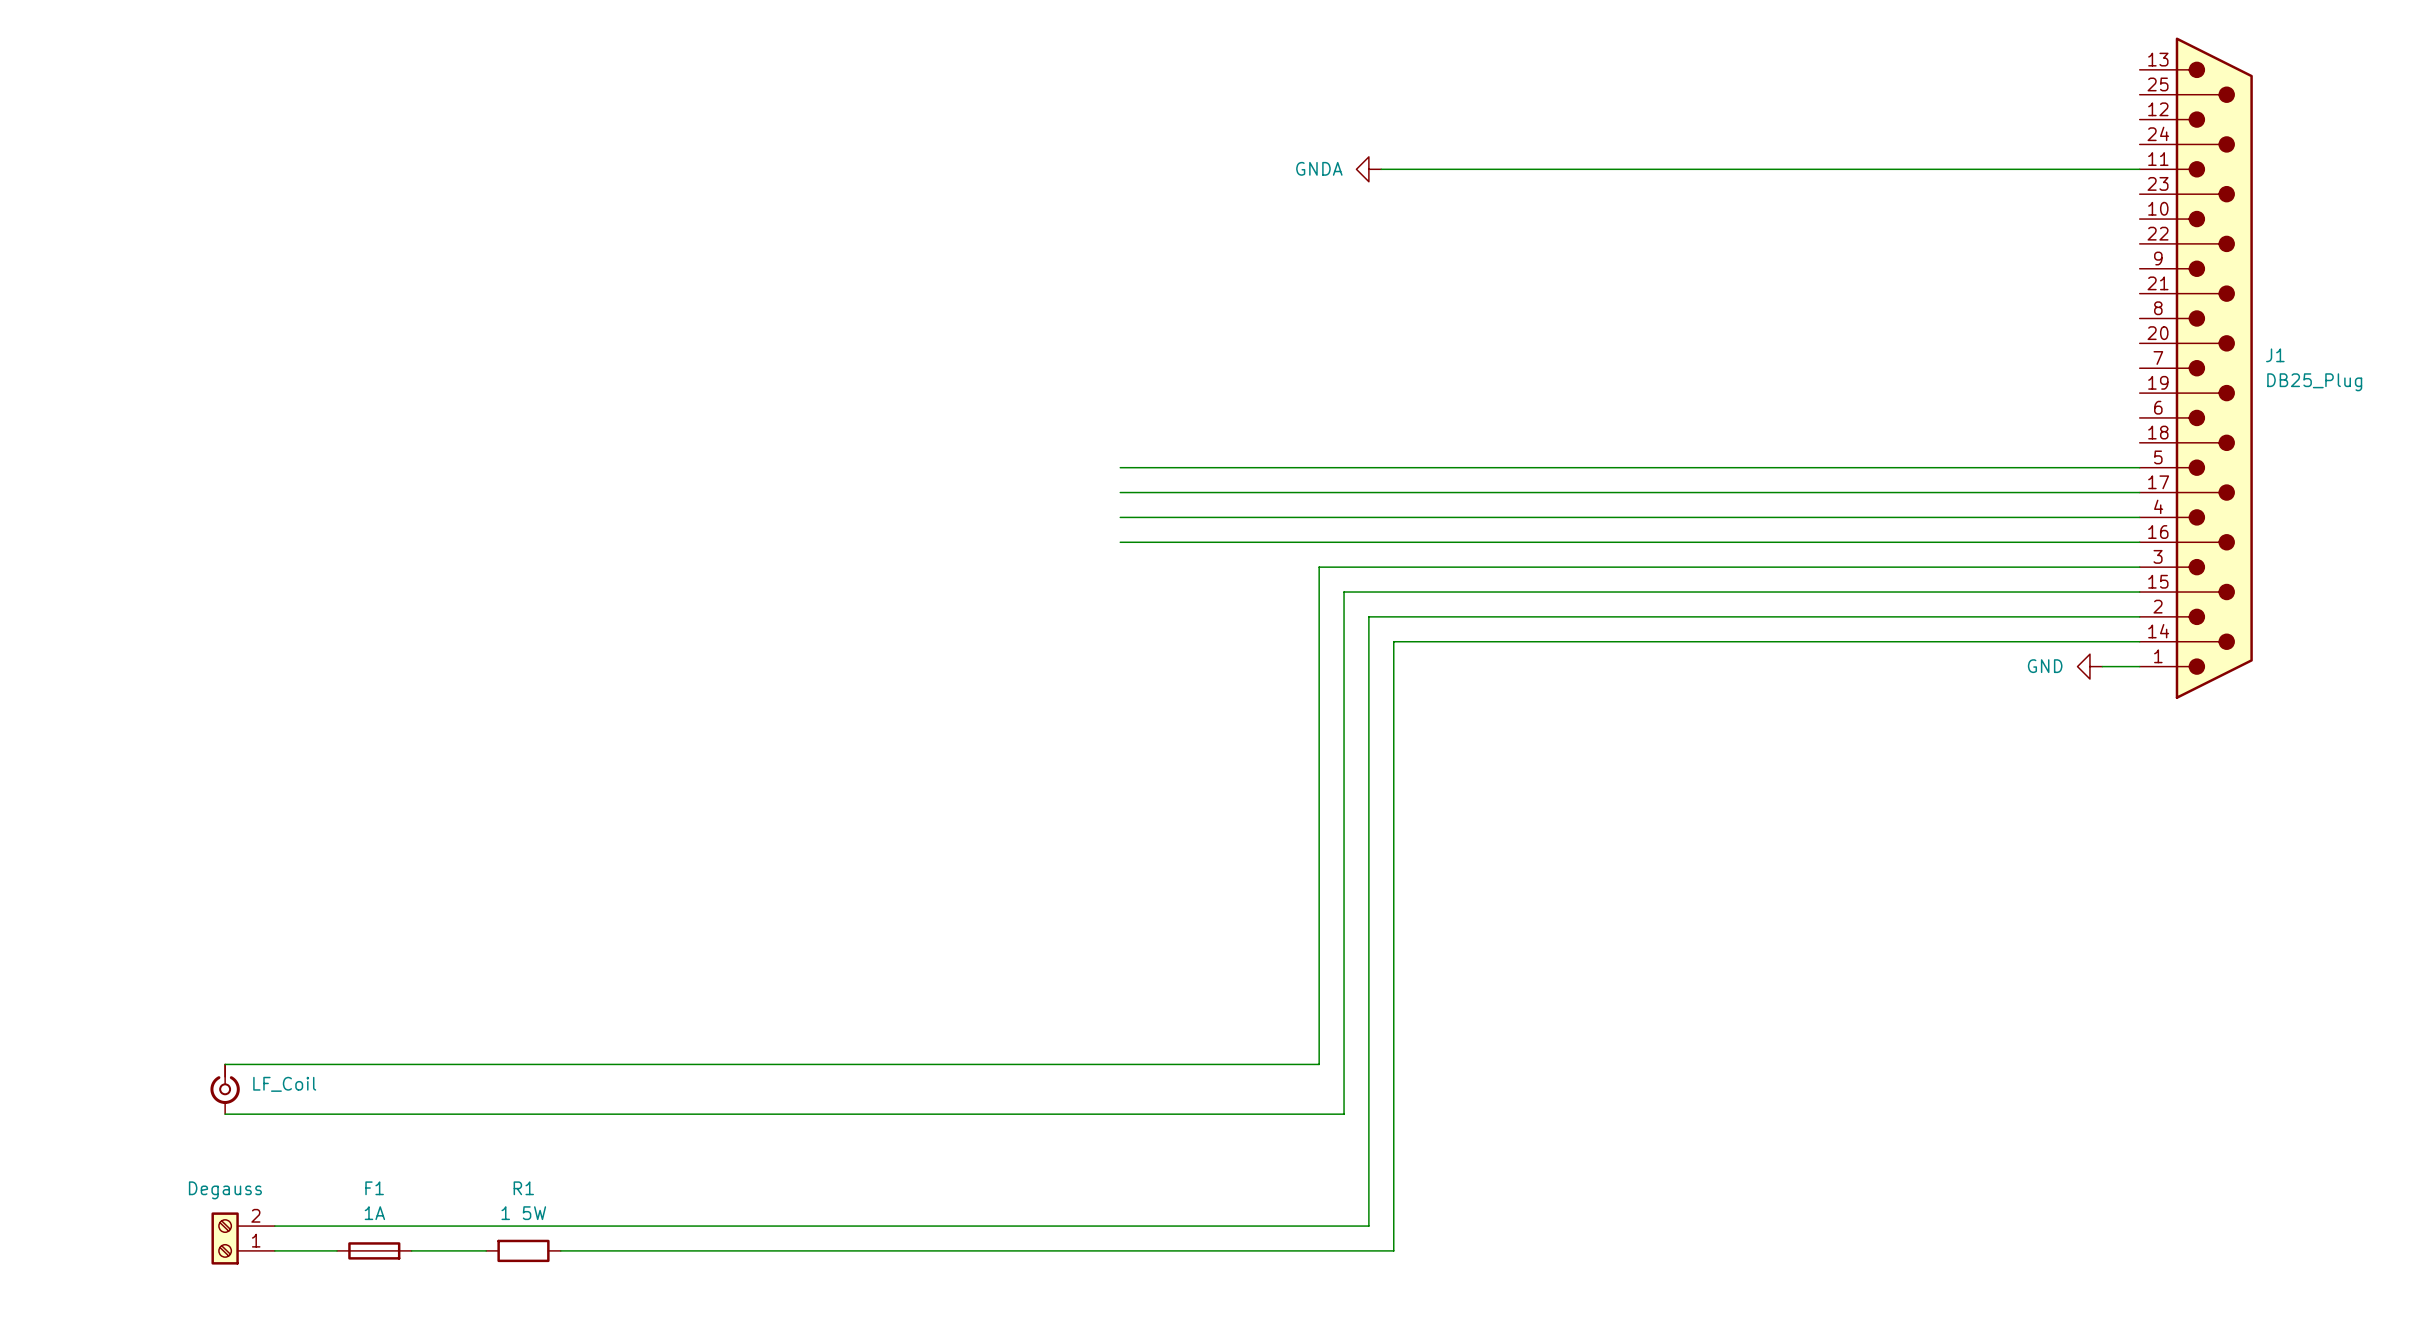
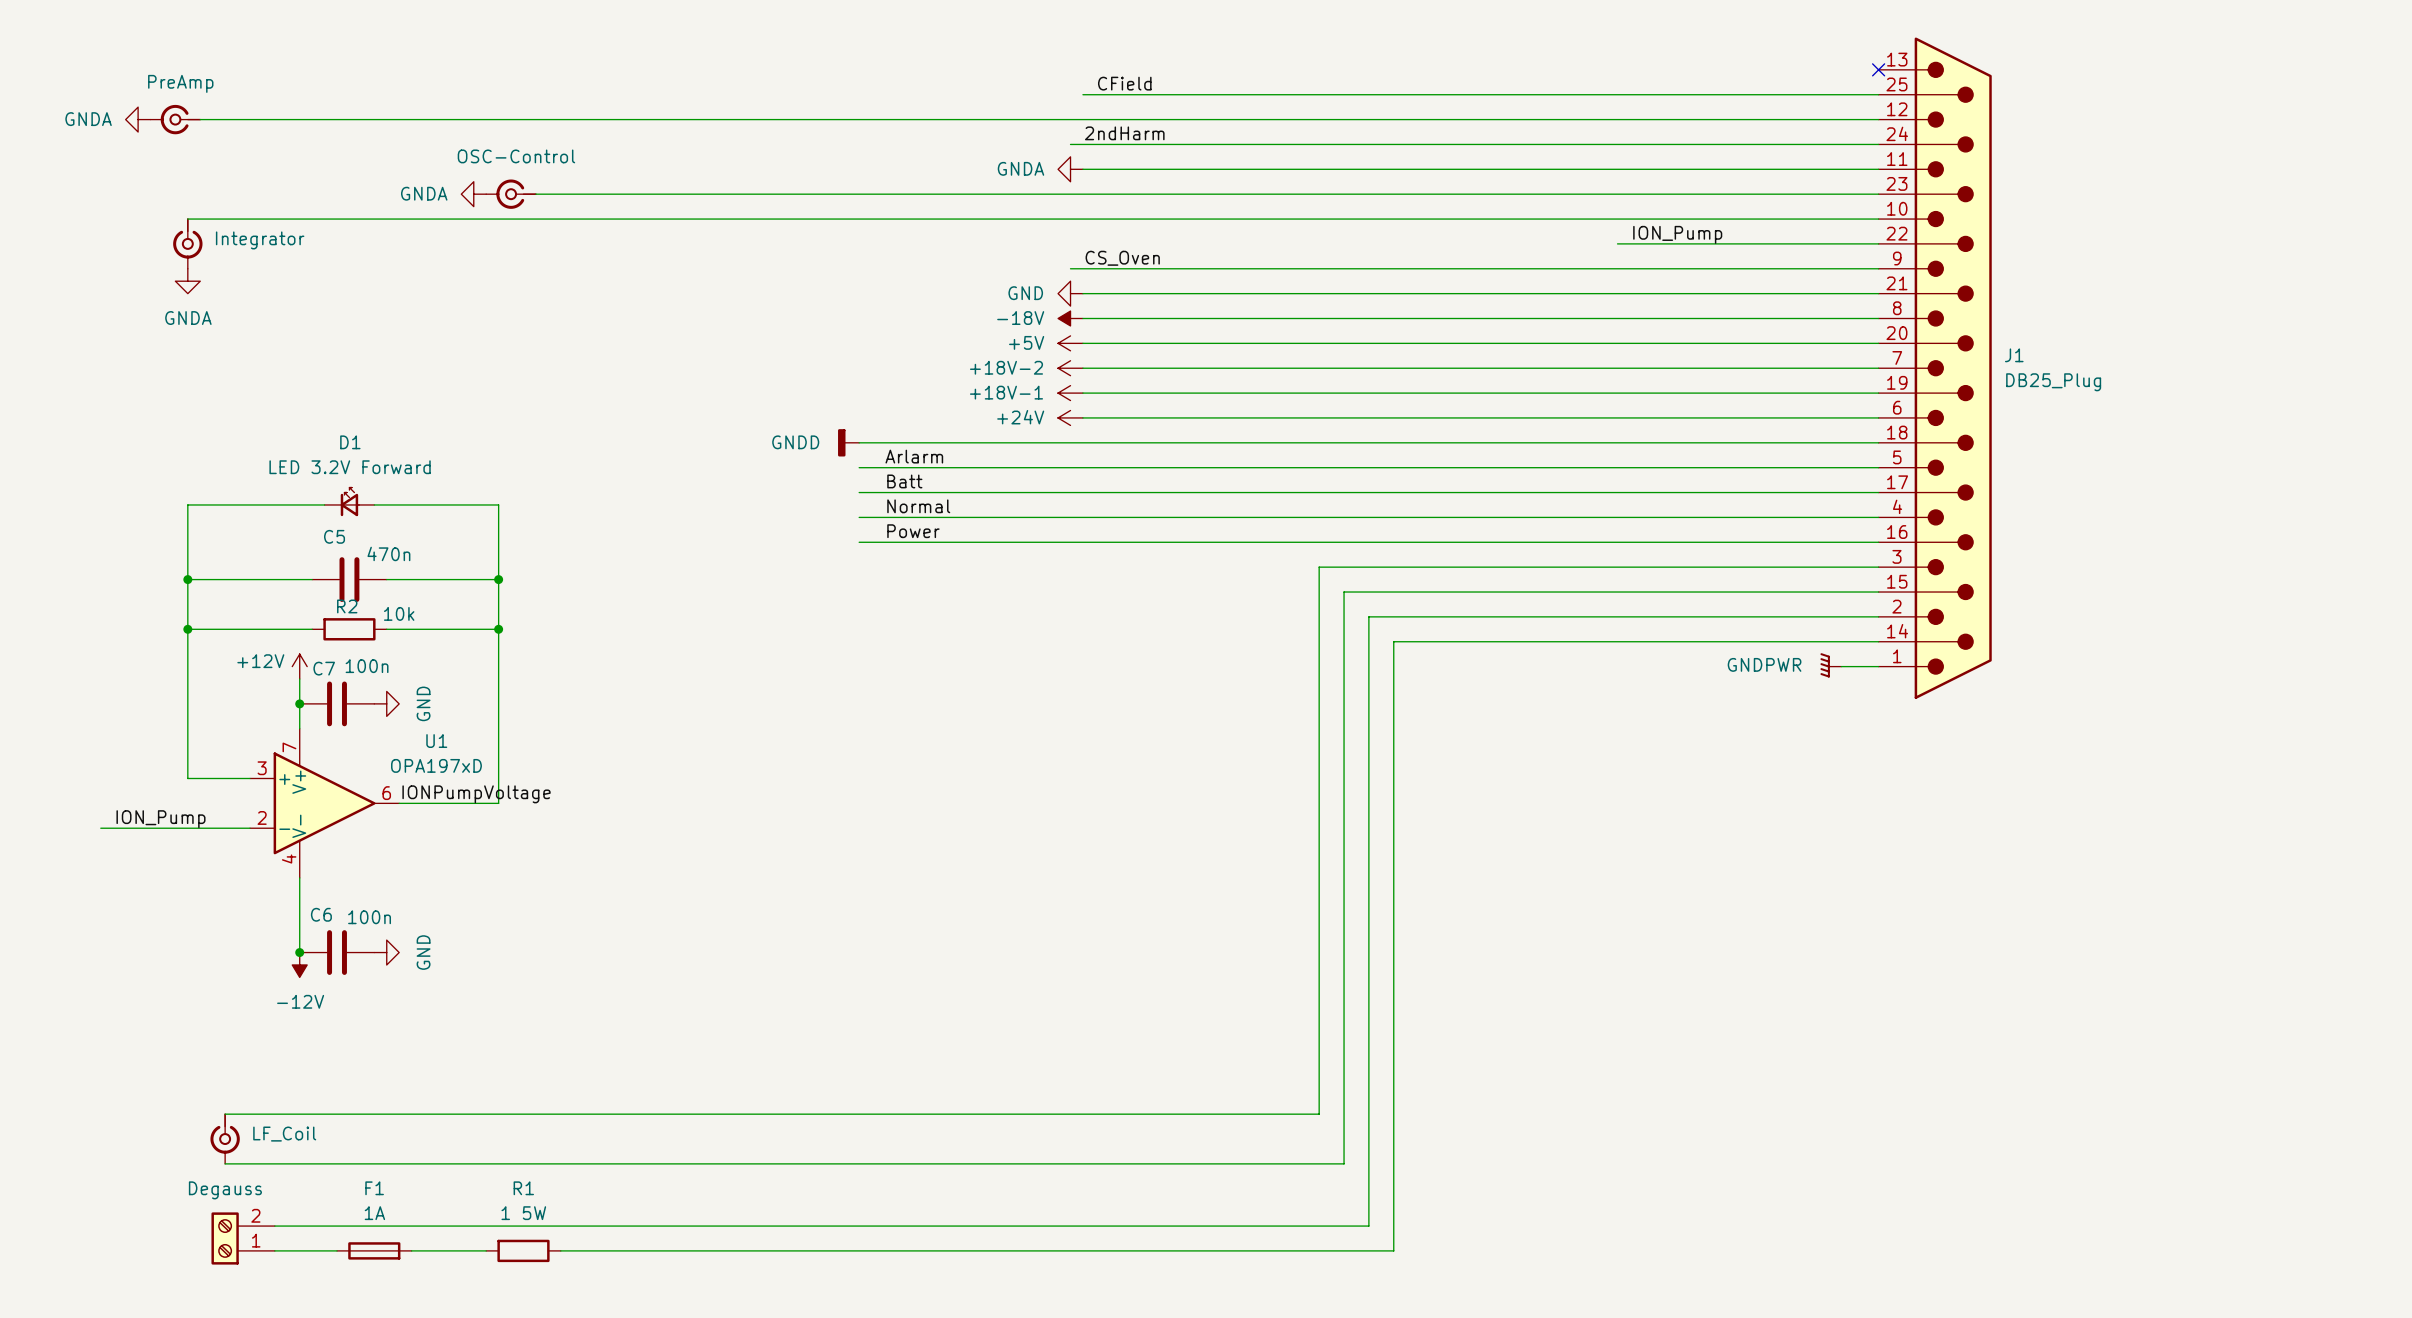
no-connect mark: none -> (1878, 69)
label: none -> CField (1124, 83)
wire: none -> (1082, 94) (1878, 94)
power symbol: none -> GNDA (138, 119)
PreAmp: none -> (175, 119)
wire: none -> (200, 119) (1878, 119)
label: none -> 2ndHarm (1124, 133)
wire: none -> (1070, 144) (1878, 144)
power symbol: none -> GNDA (1070, 169)
wire: none -> (1082, 169) (1381, 169)
power symbol: GNDA (1368, 169) -> none
wire: (1878, 169) (2139, 169) -> none
power symbol: none -> GNDA (473, 194)
OSC-Control: none -> (511, 194)
wire: none -> (535, 194) (1878, 194)
wire: none -> (187, 219) (1878, 219)
label: none -> ION_Pump (1677, 234)
Integrator: none -> (187, 243)
wire: none -> (1617, 243) (1878, 243)
label: none -> CS_Oven (1122, 258)
wire: none -> (1070, 268) (1878, 268)
power symbol: none -> GNDA (187, 281)
power symbol: none -> GND (1070, 293)
wire: none -> (1082, 293) (1878, 293)
power symbol: none -> -18V (1070, 318)
wire: none -> (1082, 318) (1878, 318)
power symbol: none -> +5V (1070, 343)
wire: none -> (1082, 343) (1878, 343)
power symbol: none -> +18V-2 (1070, 368)
wire: none -> (1082, 368) (1878, 368)
J1 position: (2196, 368) -> (1935, 368)
power symbol: none -> +18V-1 (1070, 393)
wire: none -> (1082, 393) (1878, 393)
power symbol: none -> +24V (1070, 417)
wire: none -> (1082, 417) (1878, 417)
power symbol: none -> GNDD (848, 442)
wire: none -> (859, 442) (1878, 442)
label: none -> Arlarm (914, 456)
wire: none -> (859, 467) (1120, 467)
wire: (1878, 467) (2139, 467) -> none
label: none -> Batt (904, 481)
wire: none -> (859, 492) (1120, 492)
wire: (1878, 492) (2139, 492) -> none
D1: none -> LED 3.2V Forward (349, 501)
wire: none -> (324, 504) (187, 504) (187, 778) (249, 778)
wire: none -> (374, 504) (498, 504) (498, 803) (399, 803)
label: none -> Normal (918, 506)
wire: none -> (859, 517) (1120, 517)
wire: (1878, 517) (2139, 517) -> none
label: none -> Power (913, 531)
wire: none -> (859, 542) (1120, 542)
wire: (1878, 542) (2139, 542) -> none
wire: (1878, 567) (2139, 567) -> none
wire: none -> (187, 579) (312, 579)
junction: none -> (187, 579)
C5: none -> 470n (349, 579)
wire: none -> (386, 579) (498, 579)
junction: none -> (498, 579)
wire: (1878, 592) (2139, 592) -> none
wire: (1878, 616) (2139, 616) -> none
wire: none -> (187, 629) (312, 629)
junction: none -> (187, 629)
R2: none -> 10k (349, 629)
wire: none -> (386, 629) (498, 629)
junction: none -> (498, 629)
wire: (1878, 641) (2139, 641) -> none
power symbol: none -> GNDPWR (1830, 665)
power symbol: none -> +12V (299, 666)
wire: none -> (1841, 666) (1878, 666)
power symbol: GND (2089, 666) -> none
wire: (2102, 666) (2139, 666) -> none
wire: none -> (299, 679) (299, 728)
junction: none -> (299, 703)
C7: none -> 100n (337, 703)
power symbol: none -> GND (386, 703)
label: none -> IONPumpVoltage (476, 794)
U1: none -> OPA197xD (324, 803)
label: none -> ION_Pump (160, 819)
wire: none -> (100, 828) (249, 828)
wire: none -> (299, 877) (299, 952)
junction: none -> (299, 952)
C6: none -> 100n (337, 952)
power symbol: none -> GND (386, 952)
power symbol: none -> -12V (299, 964)
wire: (225, 1064) (1319, 1064) -> none
LF_Coil position: (225, 1089) -> (225, 1139)
wire: (1319, 1114) (1344, 1114) -> (1319, 1114) (1319, 1064)
wire: none -> (1344, 1114) (1344, 1163) (225, 1163)

